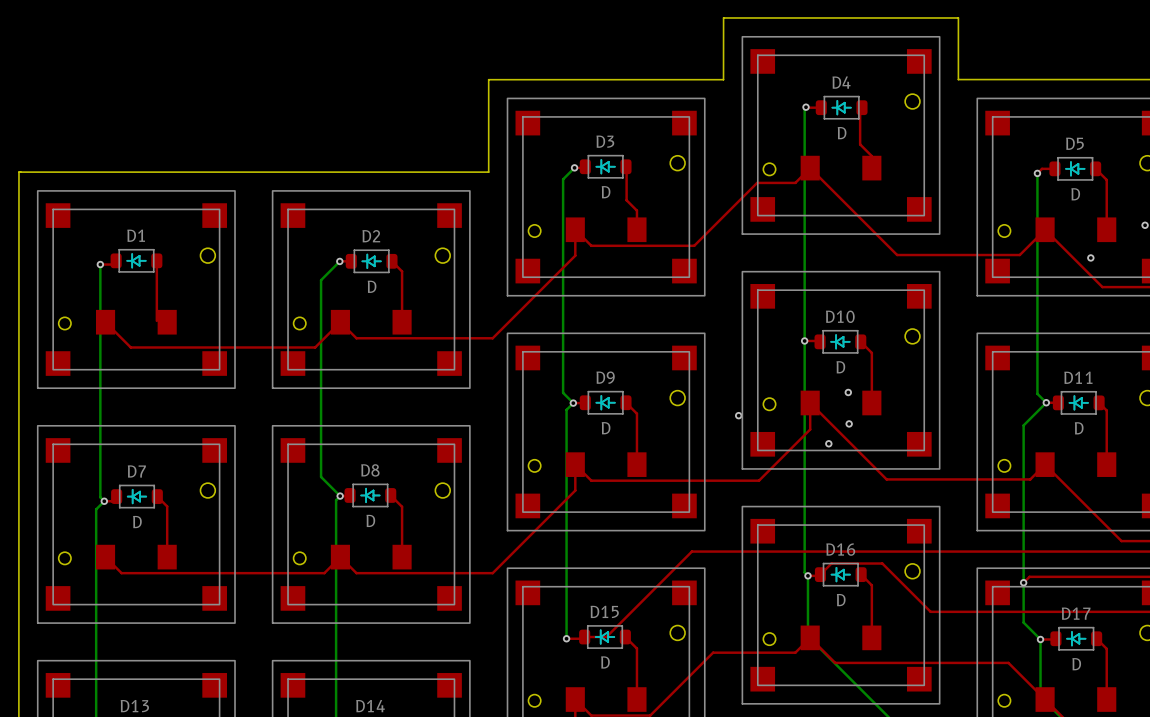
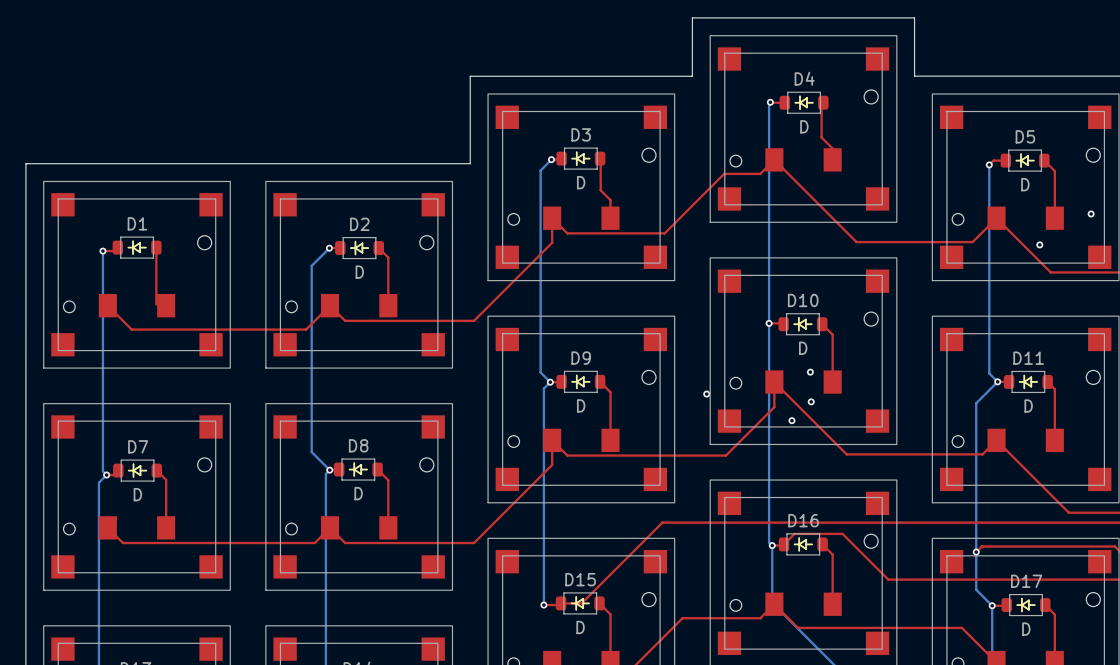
D16 value: D (841, 600) -> none

